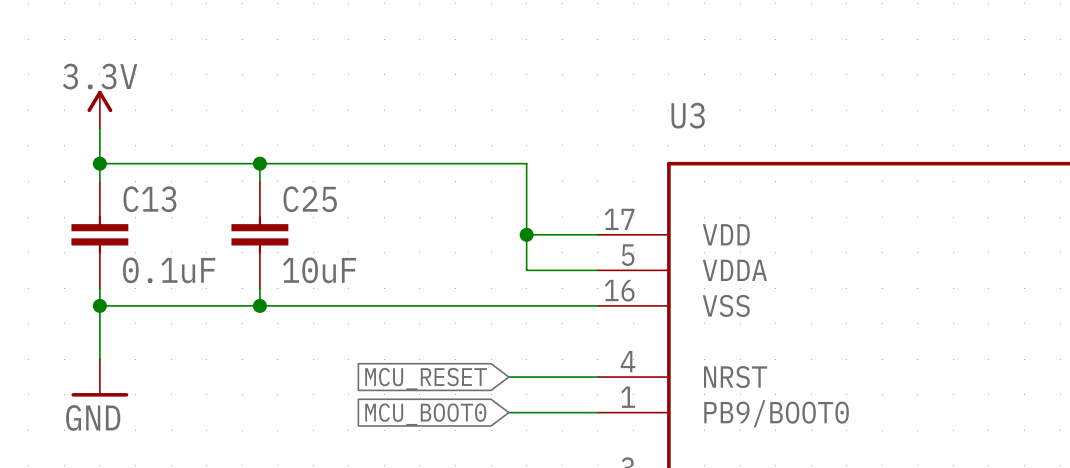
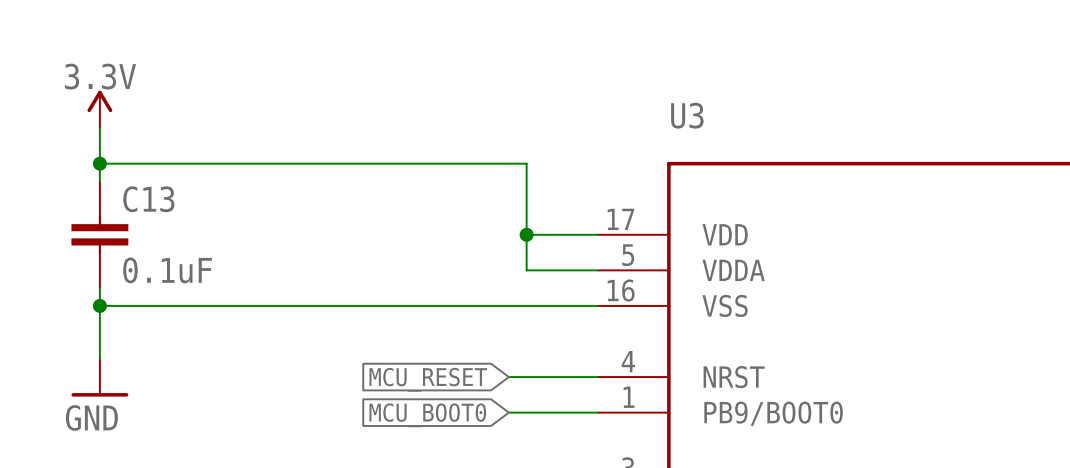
wire: (259, 163) (259, 181) -> none
junction: (259, 163) -> none
C25: 10uF (259, 234) -> none
wire: (259, 288) (259, 305) -> none
junction: (259, 305) -> none

